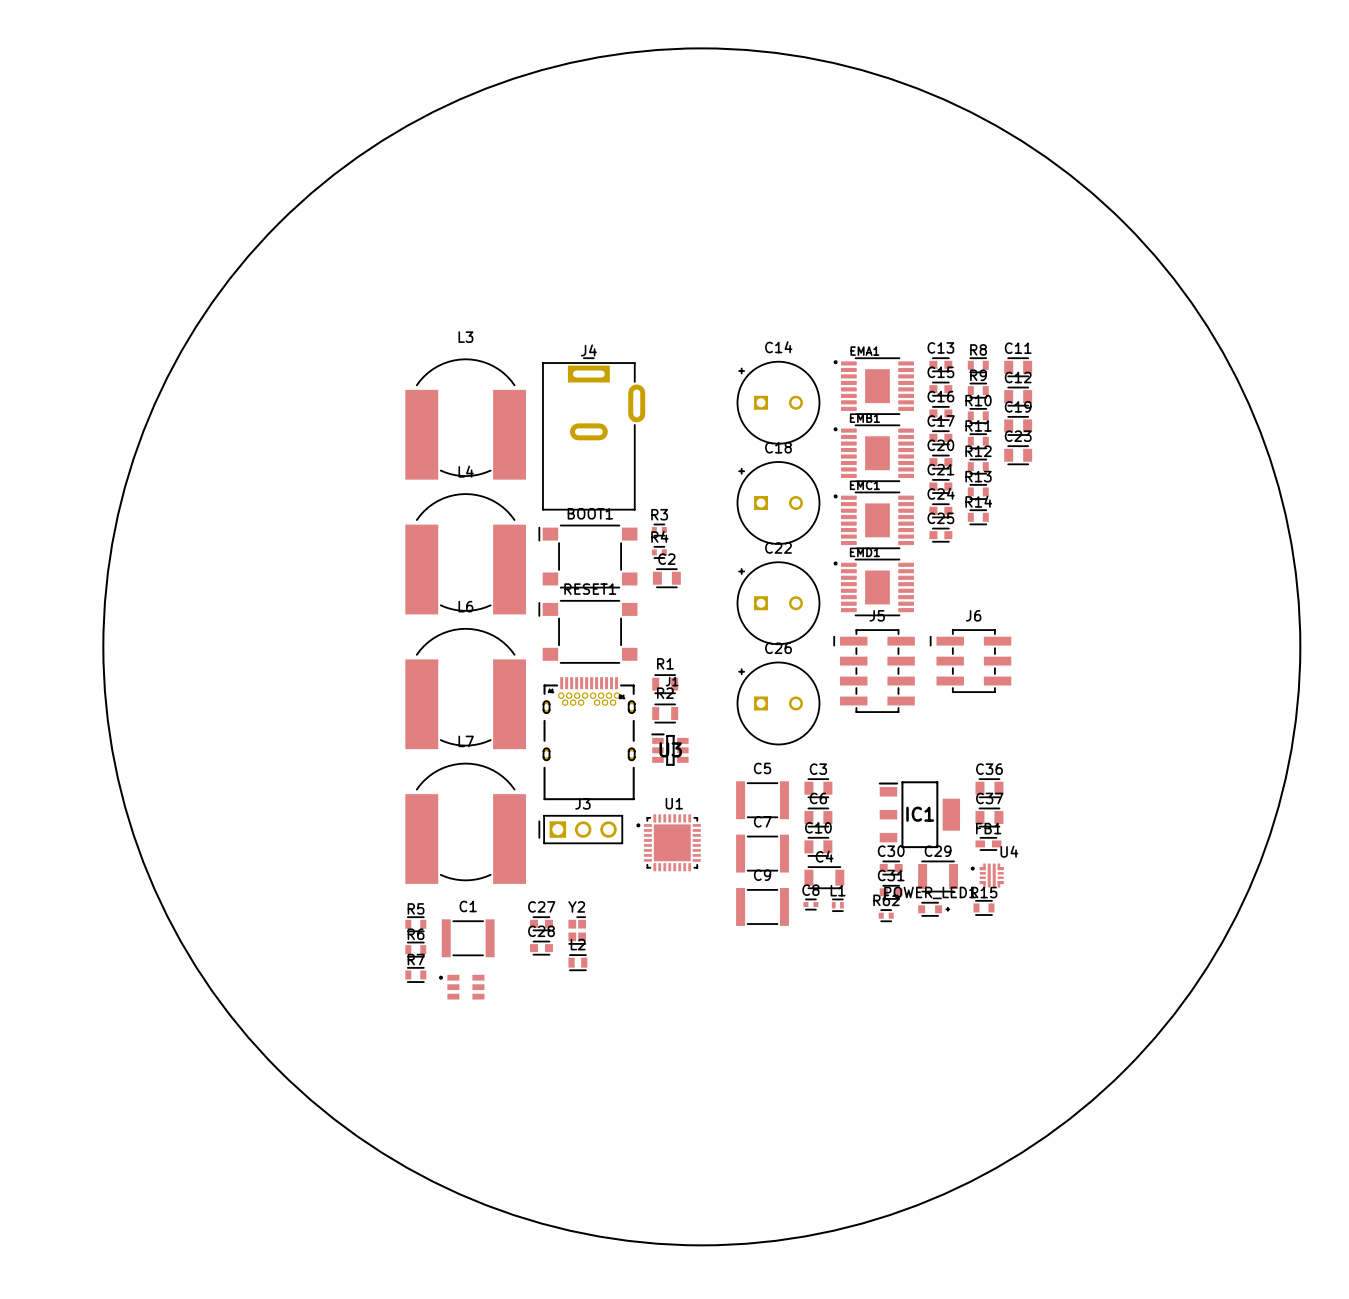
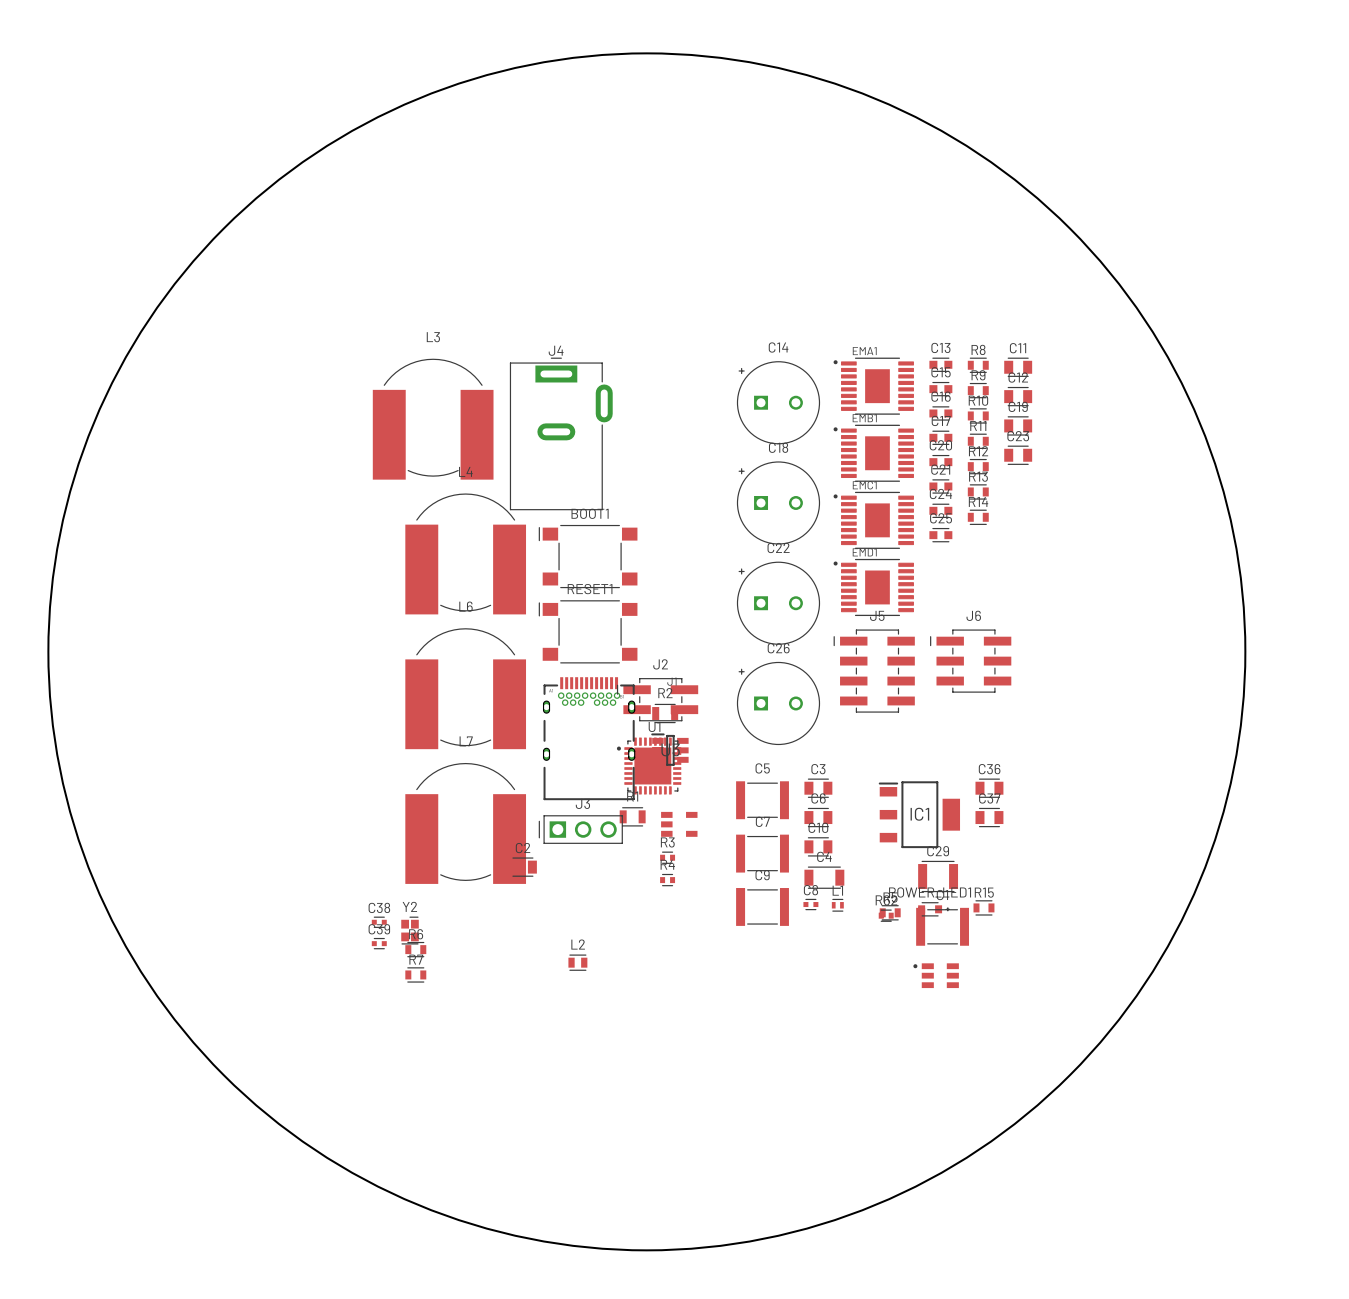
L3 position: (465, 419) -> (433, 419)
J4 position: (593, 433) -> (561, 433)
R3 position: (659, 530) -> (667, 857)
R4 position: (659, 552) -> (667, 880)
C2 position: (666, 578) -> (522, 867)
round board edge position: (701, 646) -> (646, 651)
R1 position: (665, 684) -> (632, 816)
J2: none -> (657, 699)
part: none -> (679, 824)
U1 position: (668, 842) -> (649, 766)
FB1: (988, 843) -> none
C30: (891, 868) -> none
U4: (987, 875) -> none
C31: (891, 892) -> none
C38: none -> (379, 922)
C27: (541, 923) -> none
R5 position: (415, 924) -> (890, 912)
Y2 position: (577, 930) -> (410, 930)
C1 position: (468, 938) -> (942, 926)
C39: none -> (379, 943)
C28: (541, 948) -> none
part: none -> (936, 975)
part: (461, 987) -> none

